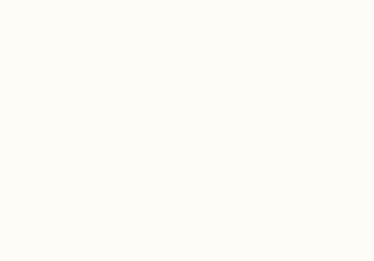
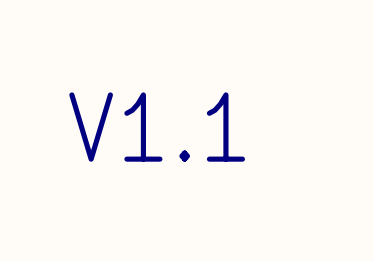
text: none -> V1.1 (157, 127)

